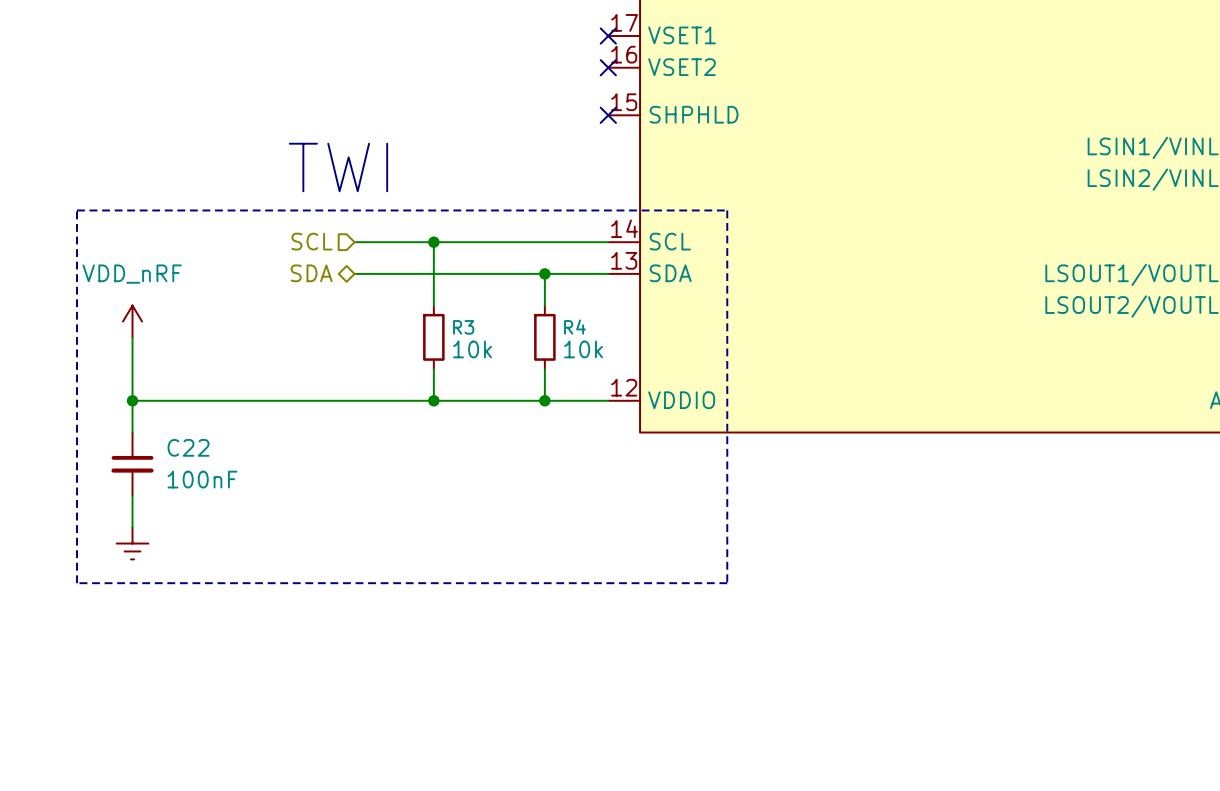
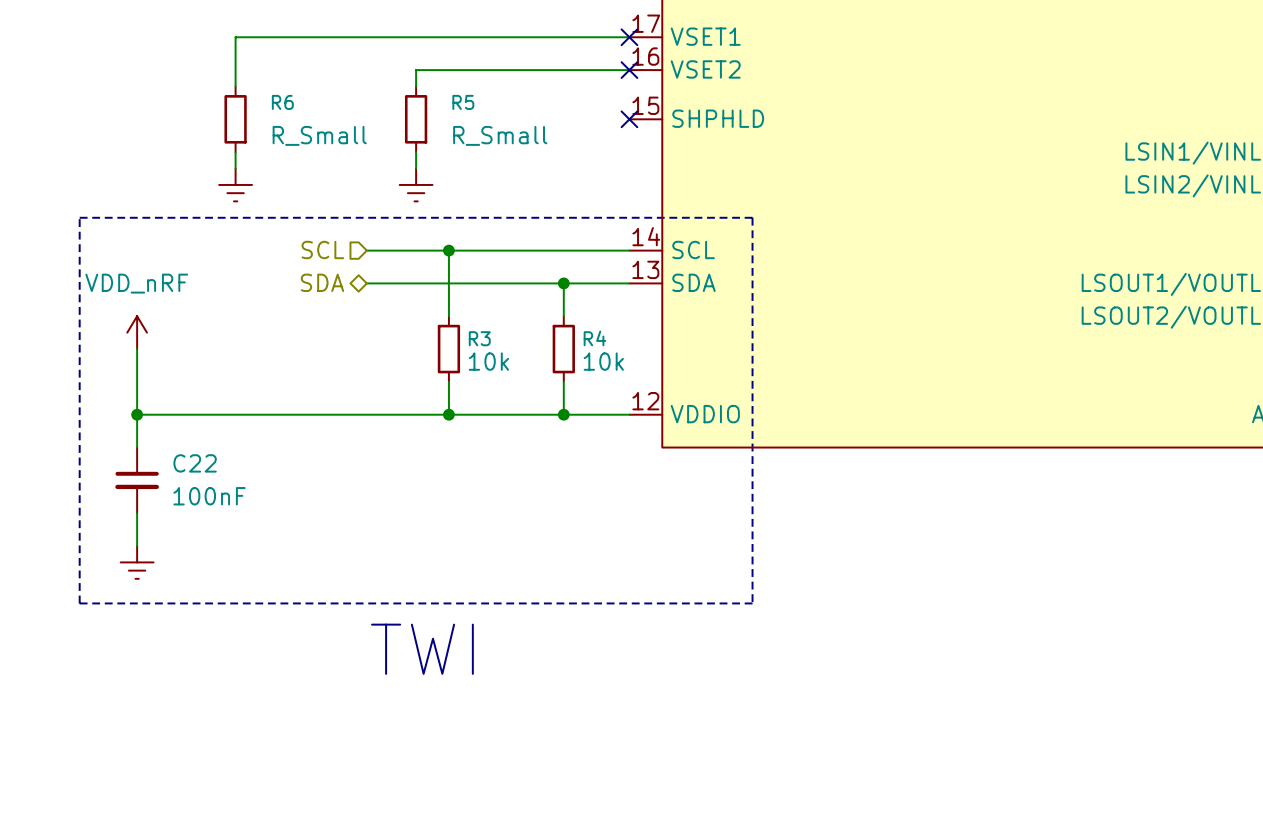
wire: none -> (629, 37) (235, 37) (235, 86)
wire: none -> (629, 70) (416, 70) (416, 86)
R6: none -> R_Small (235, 119)
R5: none -> R_Small (416, 119)
wire: none -> (235, 152) (235, 168)
wire: none -> (416, 152) (416, 168)
text: TWI (338, 167) -> none
power symbol: none -> (235, 184)
power symbol: none -> (416, 184)
text: none -> TWI (422, 649)

